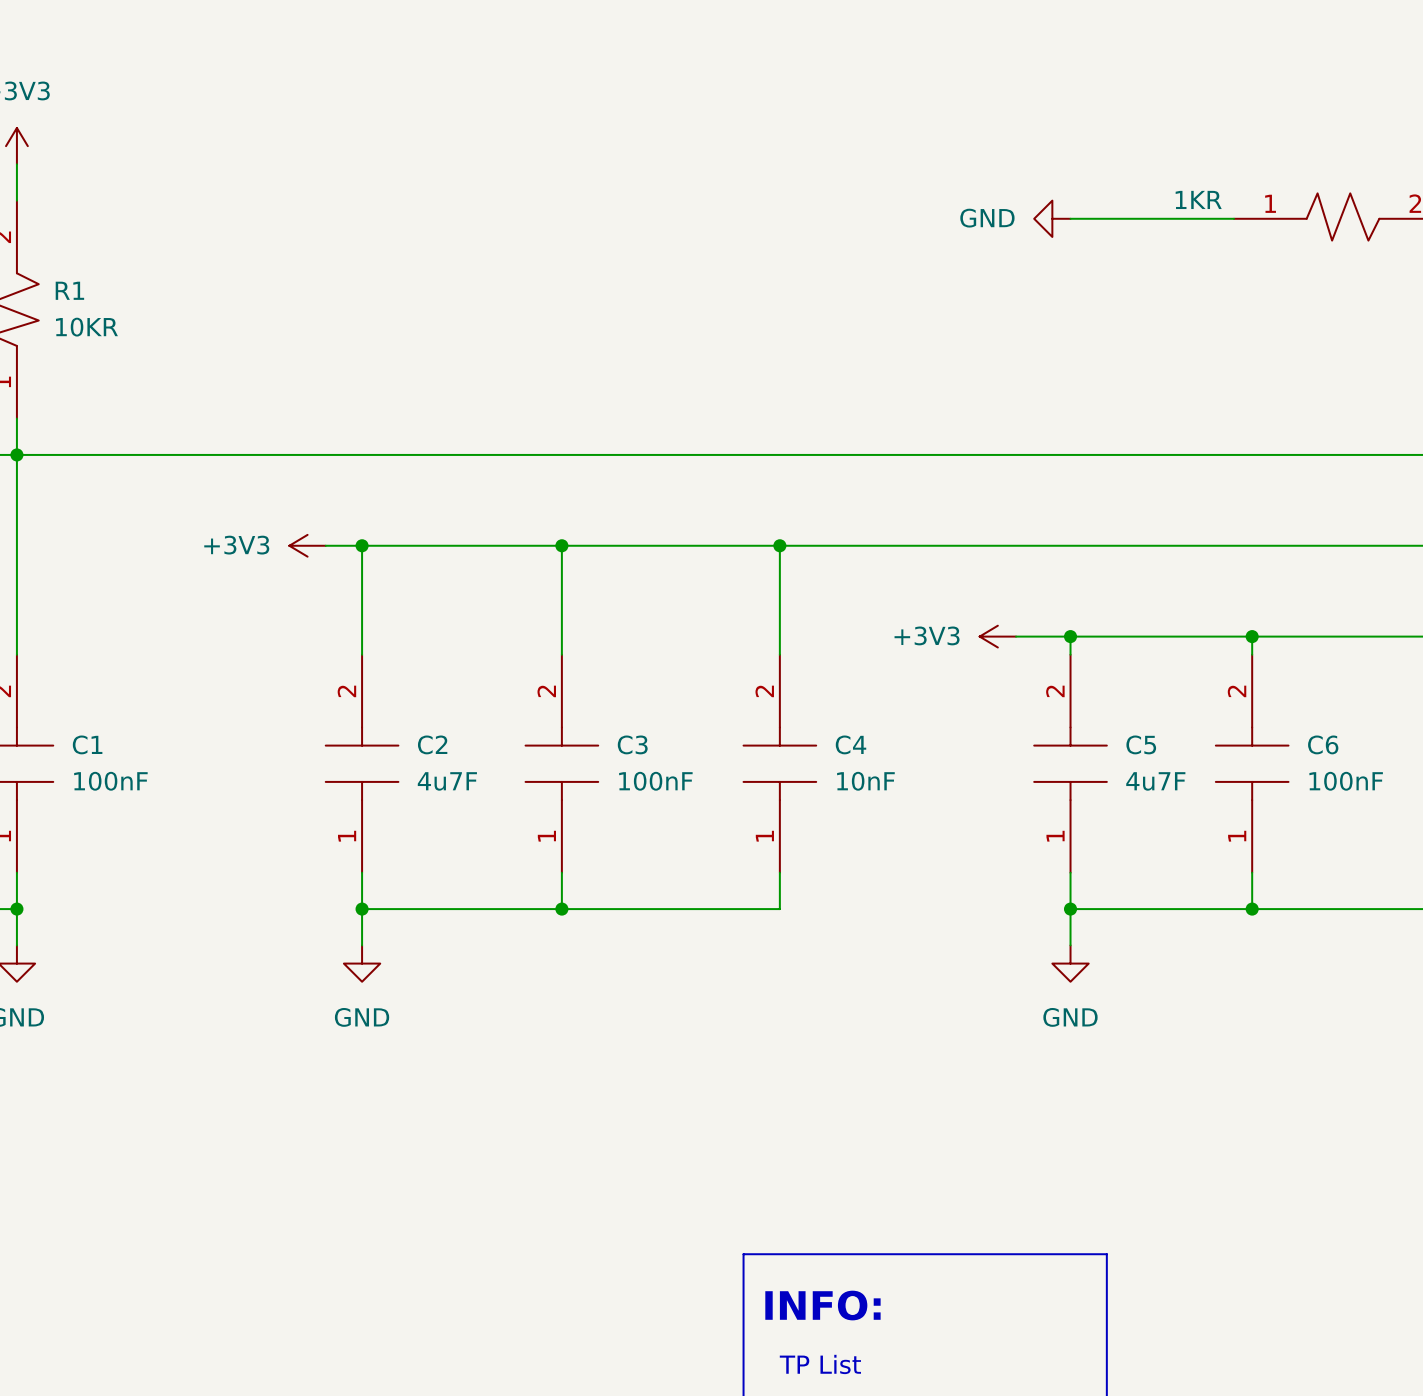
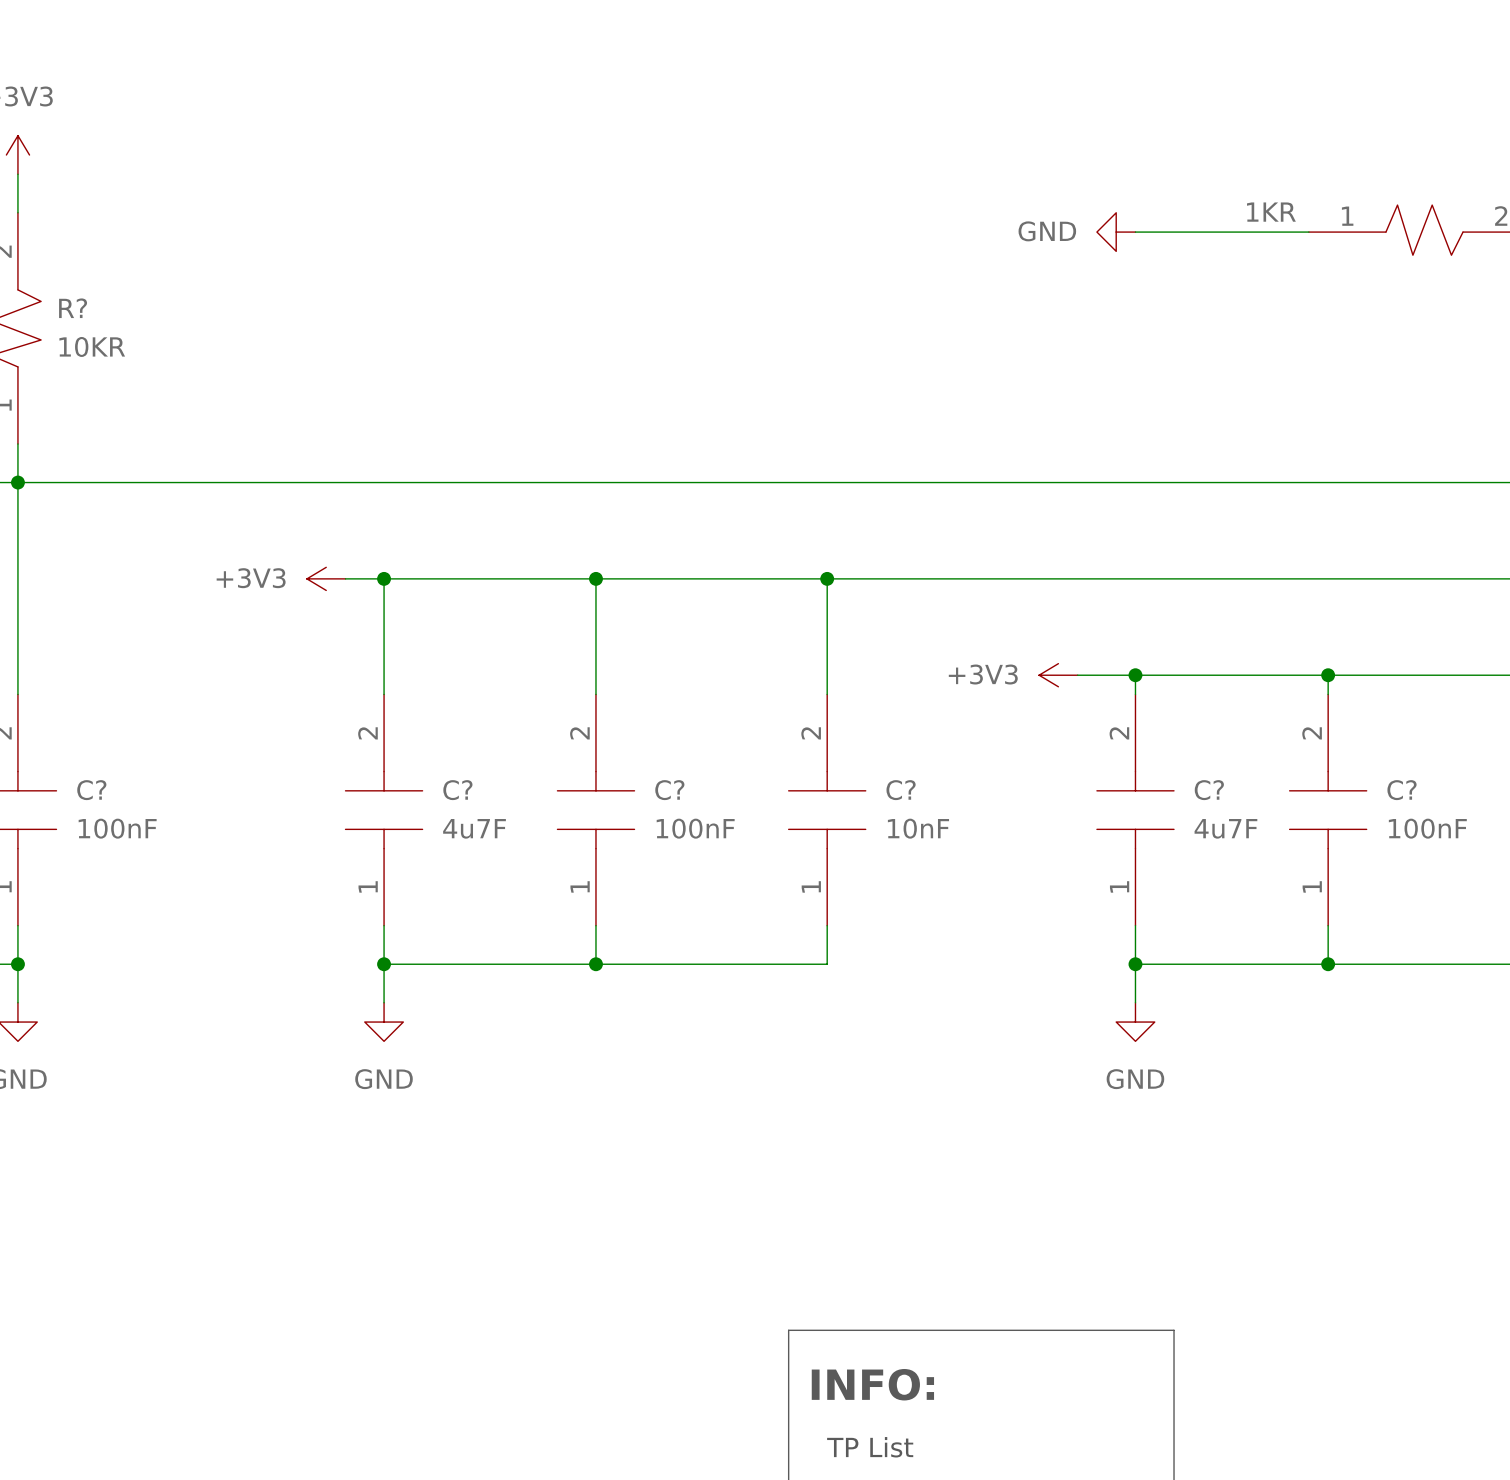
R1 name: R1 (69, 290) -> R? (73, 308)
C1 name: C1 (87, 744) -> C? (91, 790)
C2 name: C2 (432, 744) -> C? (457, 790)
C3 name: C3 (632, 744) -> C? (669, 790)
C4 name: C4 (851, 744) -> C? (901, 790)
C5 name: C5 (1141, 744) -> C? (1209, 790)
C6 name: C6 (1323, 744) -> C? (1402, 790)

